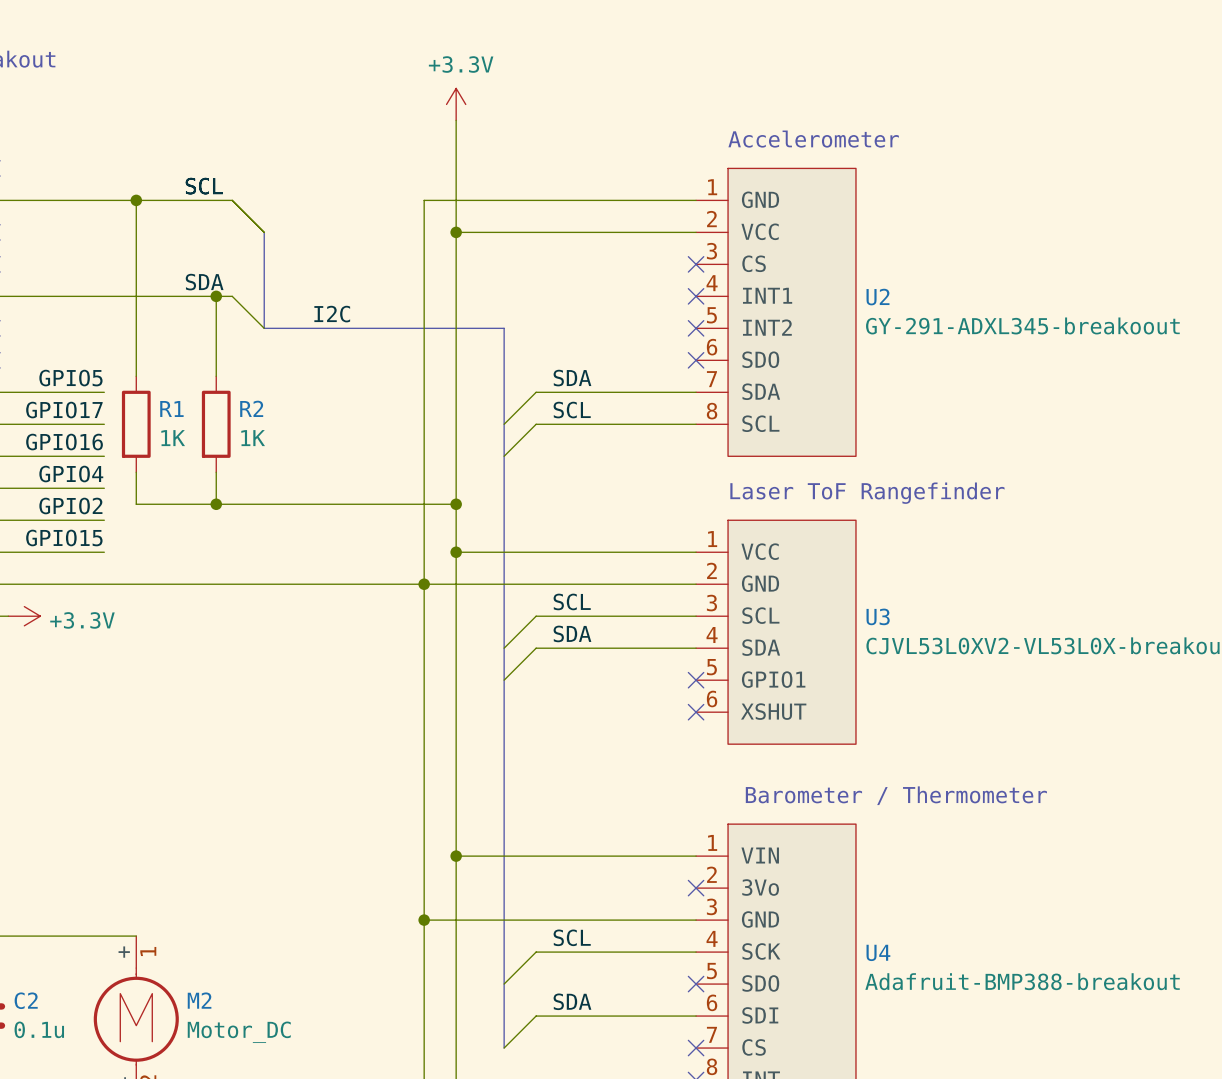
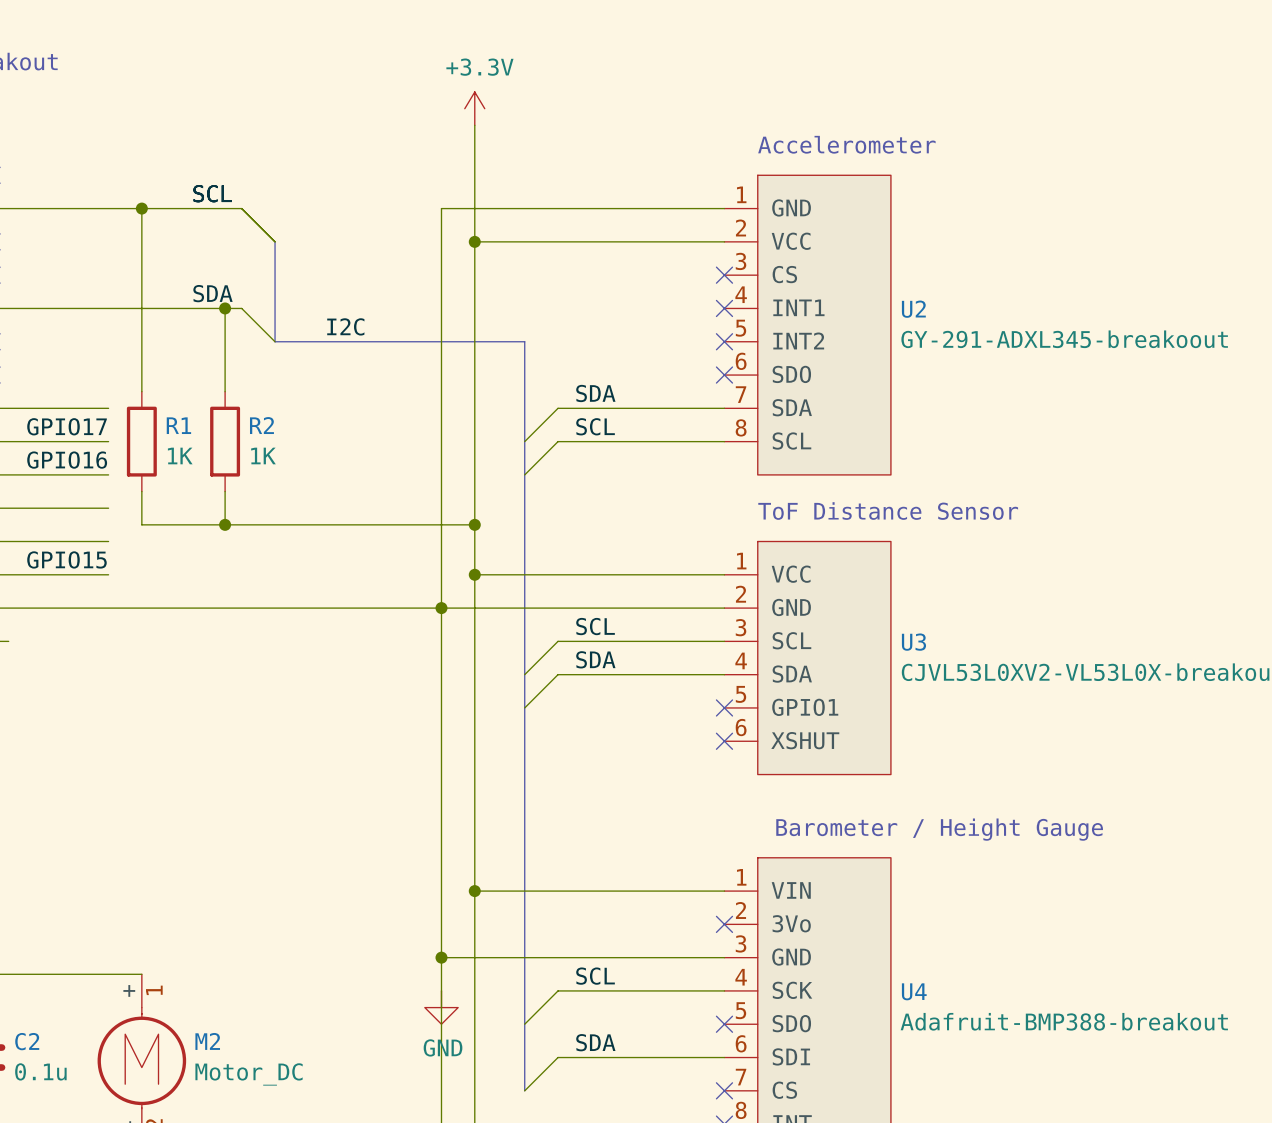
label: GPIO5 (70, 378) -> none
label: GPIO4 (71, 474) -> none
text: Laser ToF Rangefinder (867, 493) -> ToF Distance Sensor (888, 511)
label: GPIO2 (70, 506) -> none
power symbol: +3.3V (24, 616) -> none
text: Barometer / Thermometer (896, 795) -> Barometer / Height Gauge (939, 829)
power symbol: none -> GND (441, 1007)

